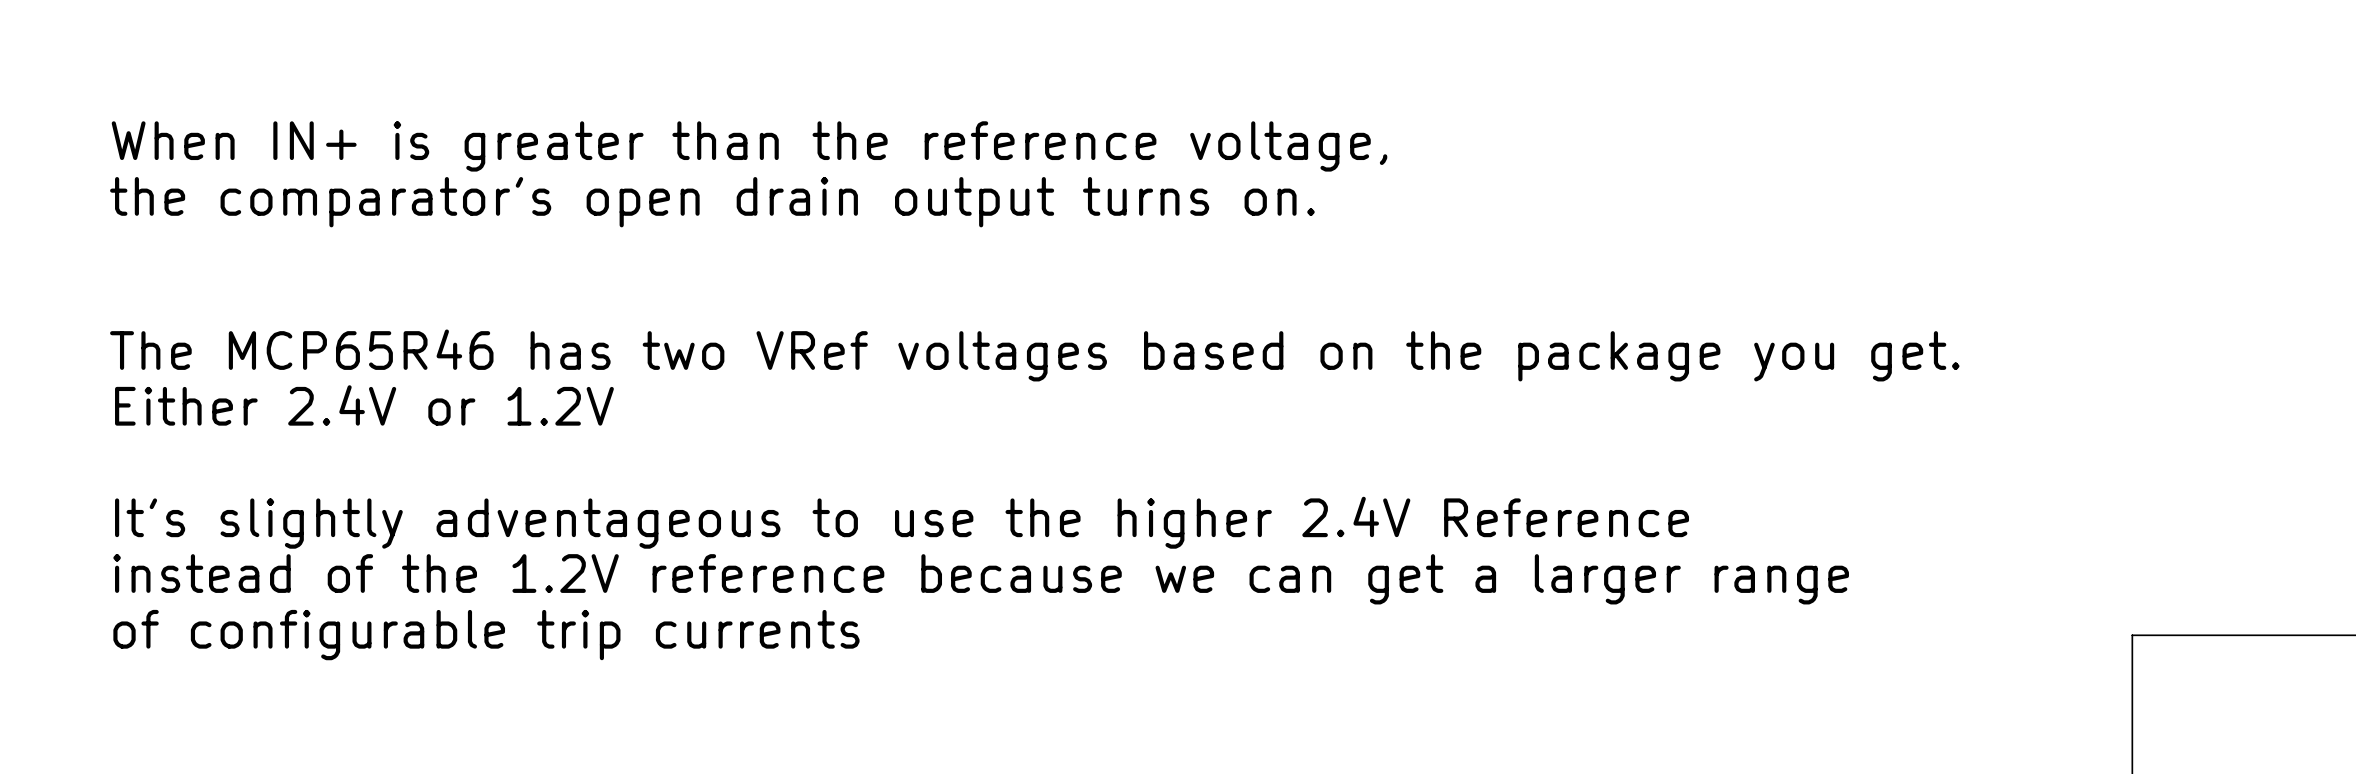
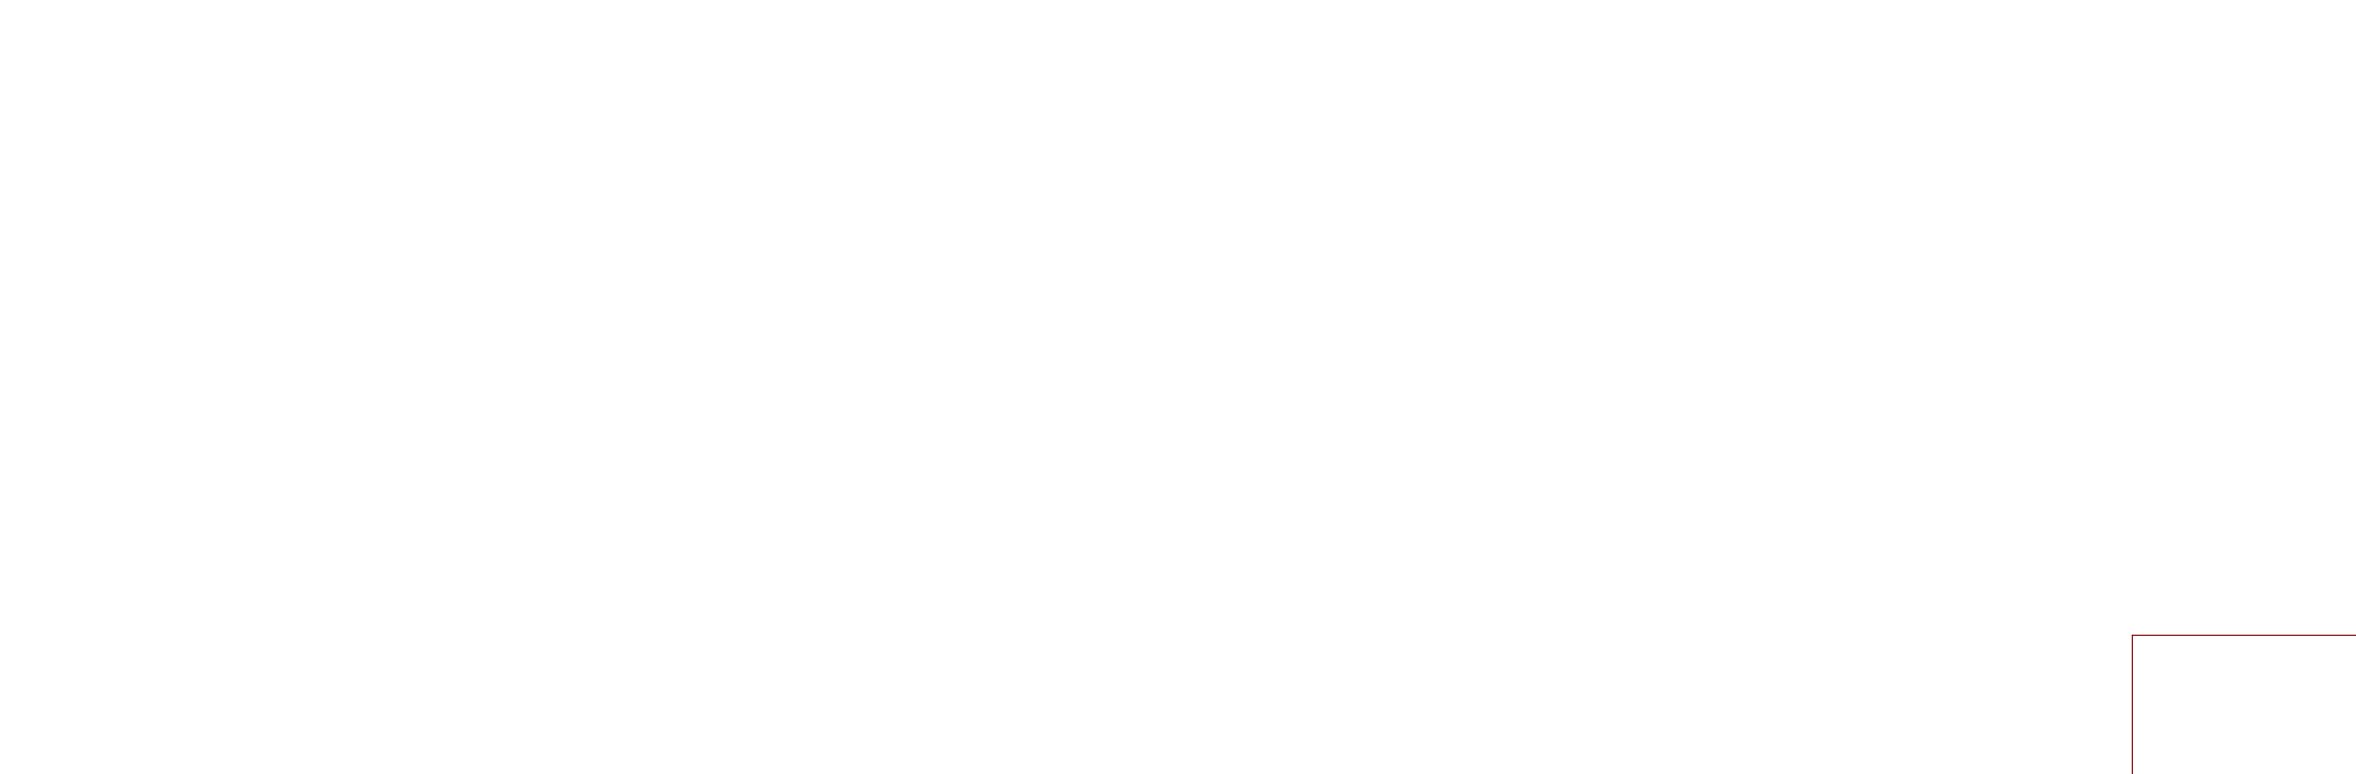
text: When IN+ is greater than the reference voltage, (749, 146) -> none
text: the comparator's open drain output turns on. (712, 202) -> none
text: The MCP65R46 has two VRef voltages based on the package you get. (1034, 355) -> none
text: Either 2.4V or 1.2V (364, 405) -> none
text: It's slightly adventageous to use the higher 2.4V Reference (902, 522) -> none
text: instead of the 1.2V reference because we can get a larger range (981, 579) -> none
text: of configurable trip currents (486, 635) -> none

